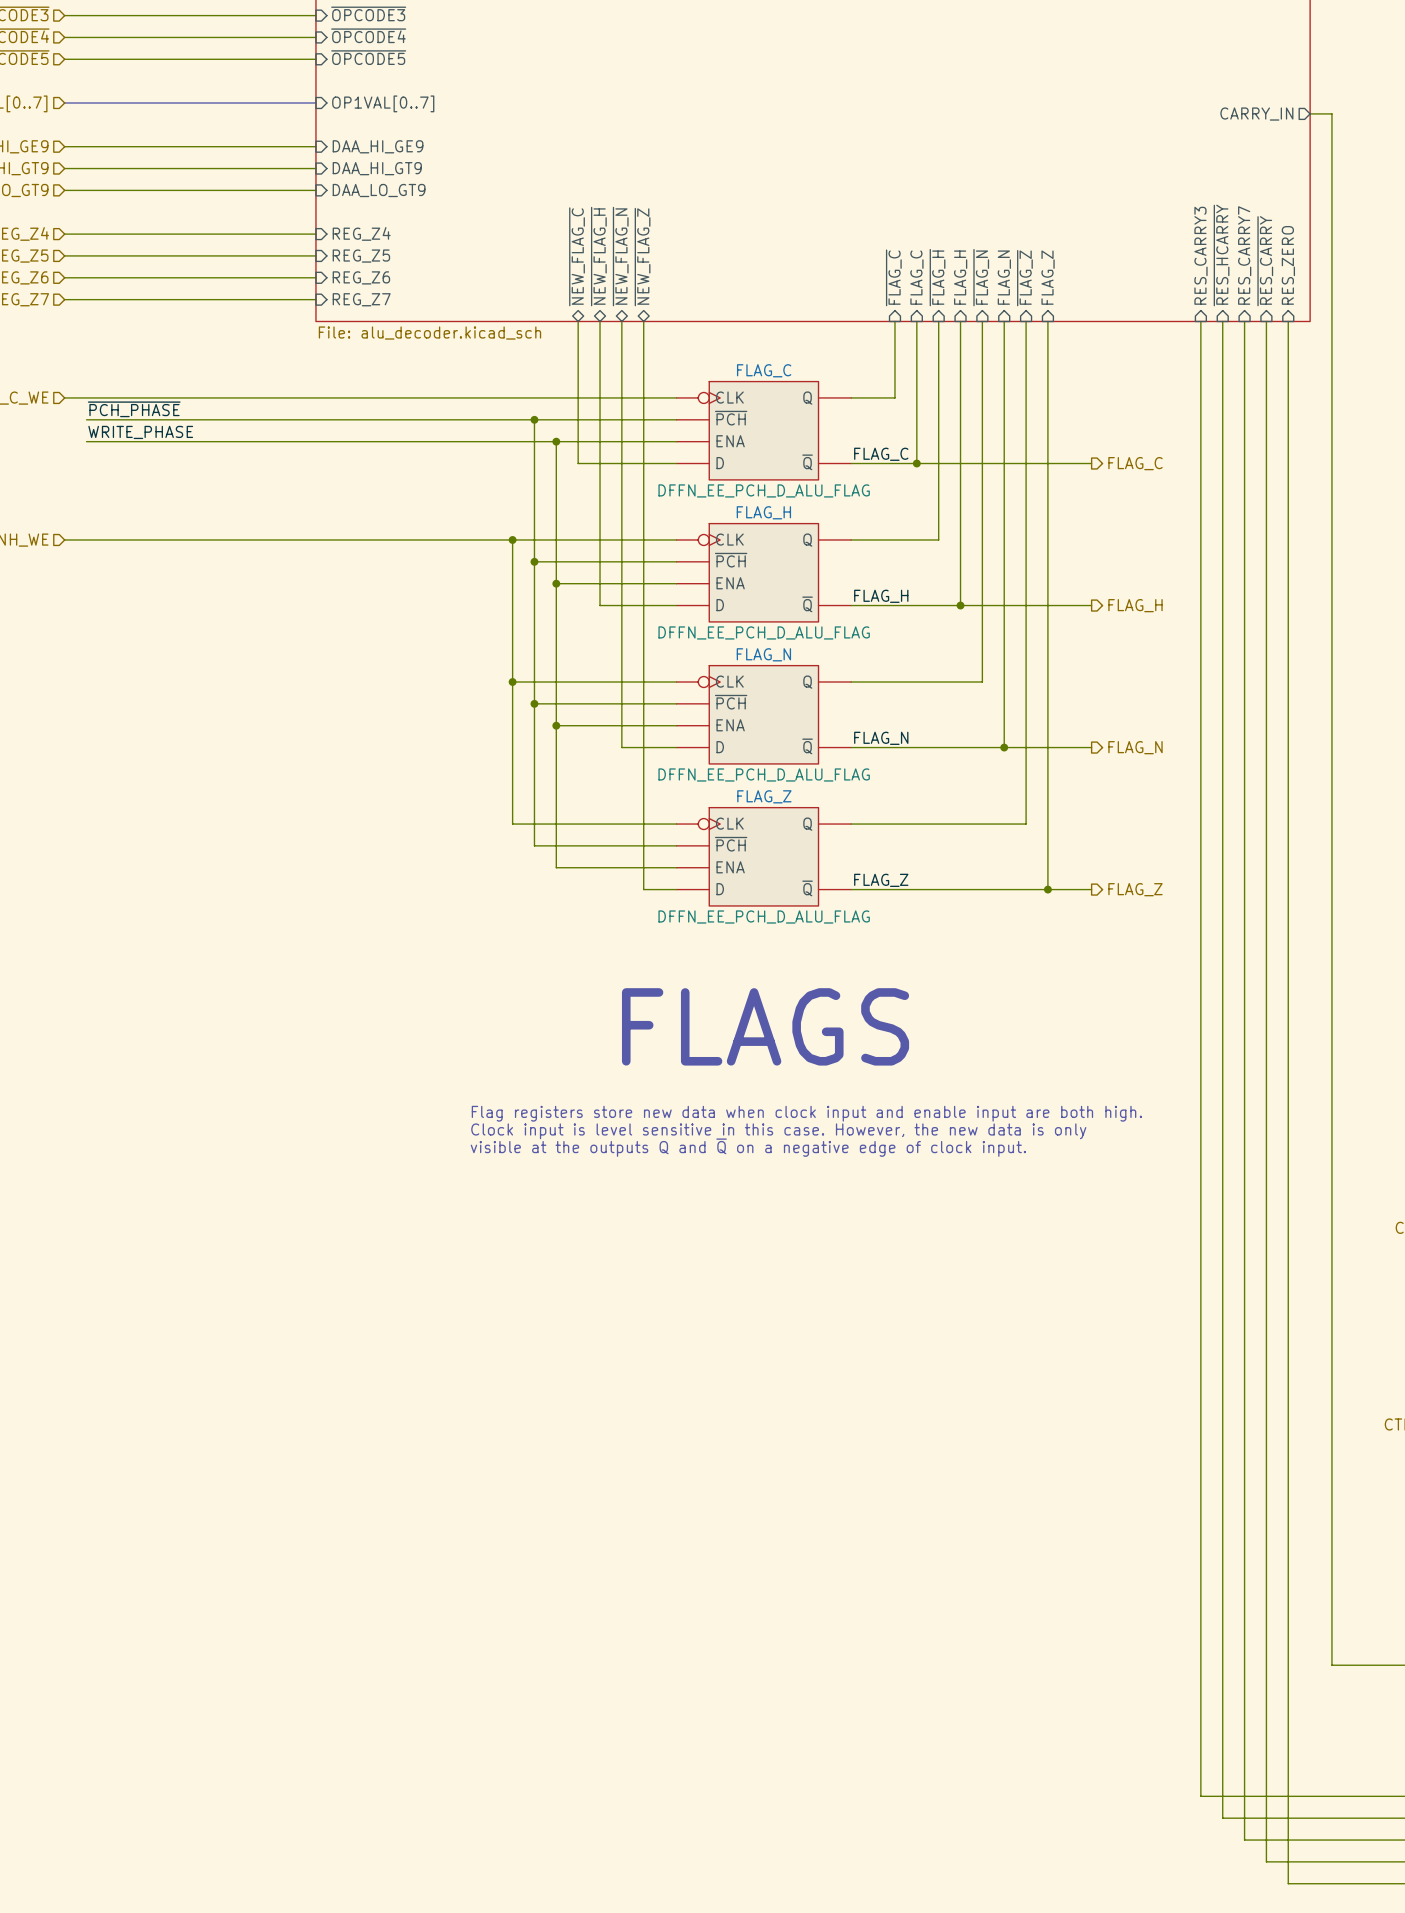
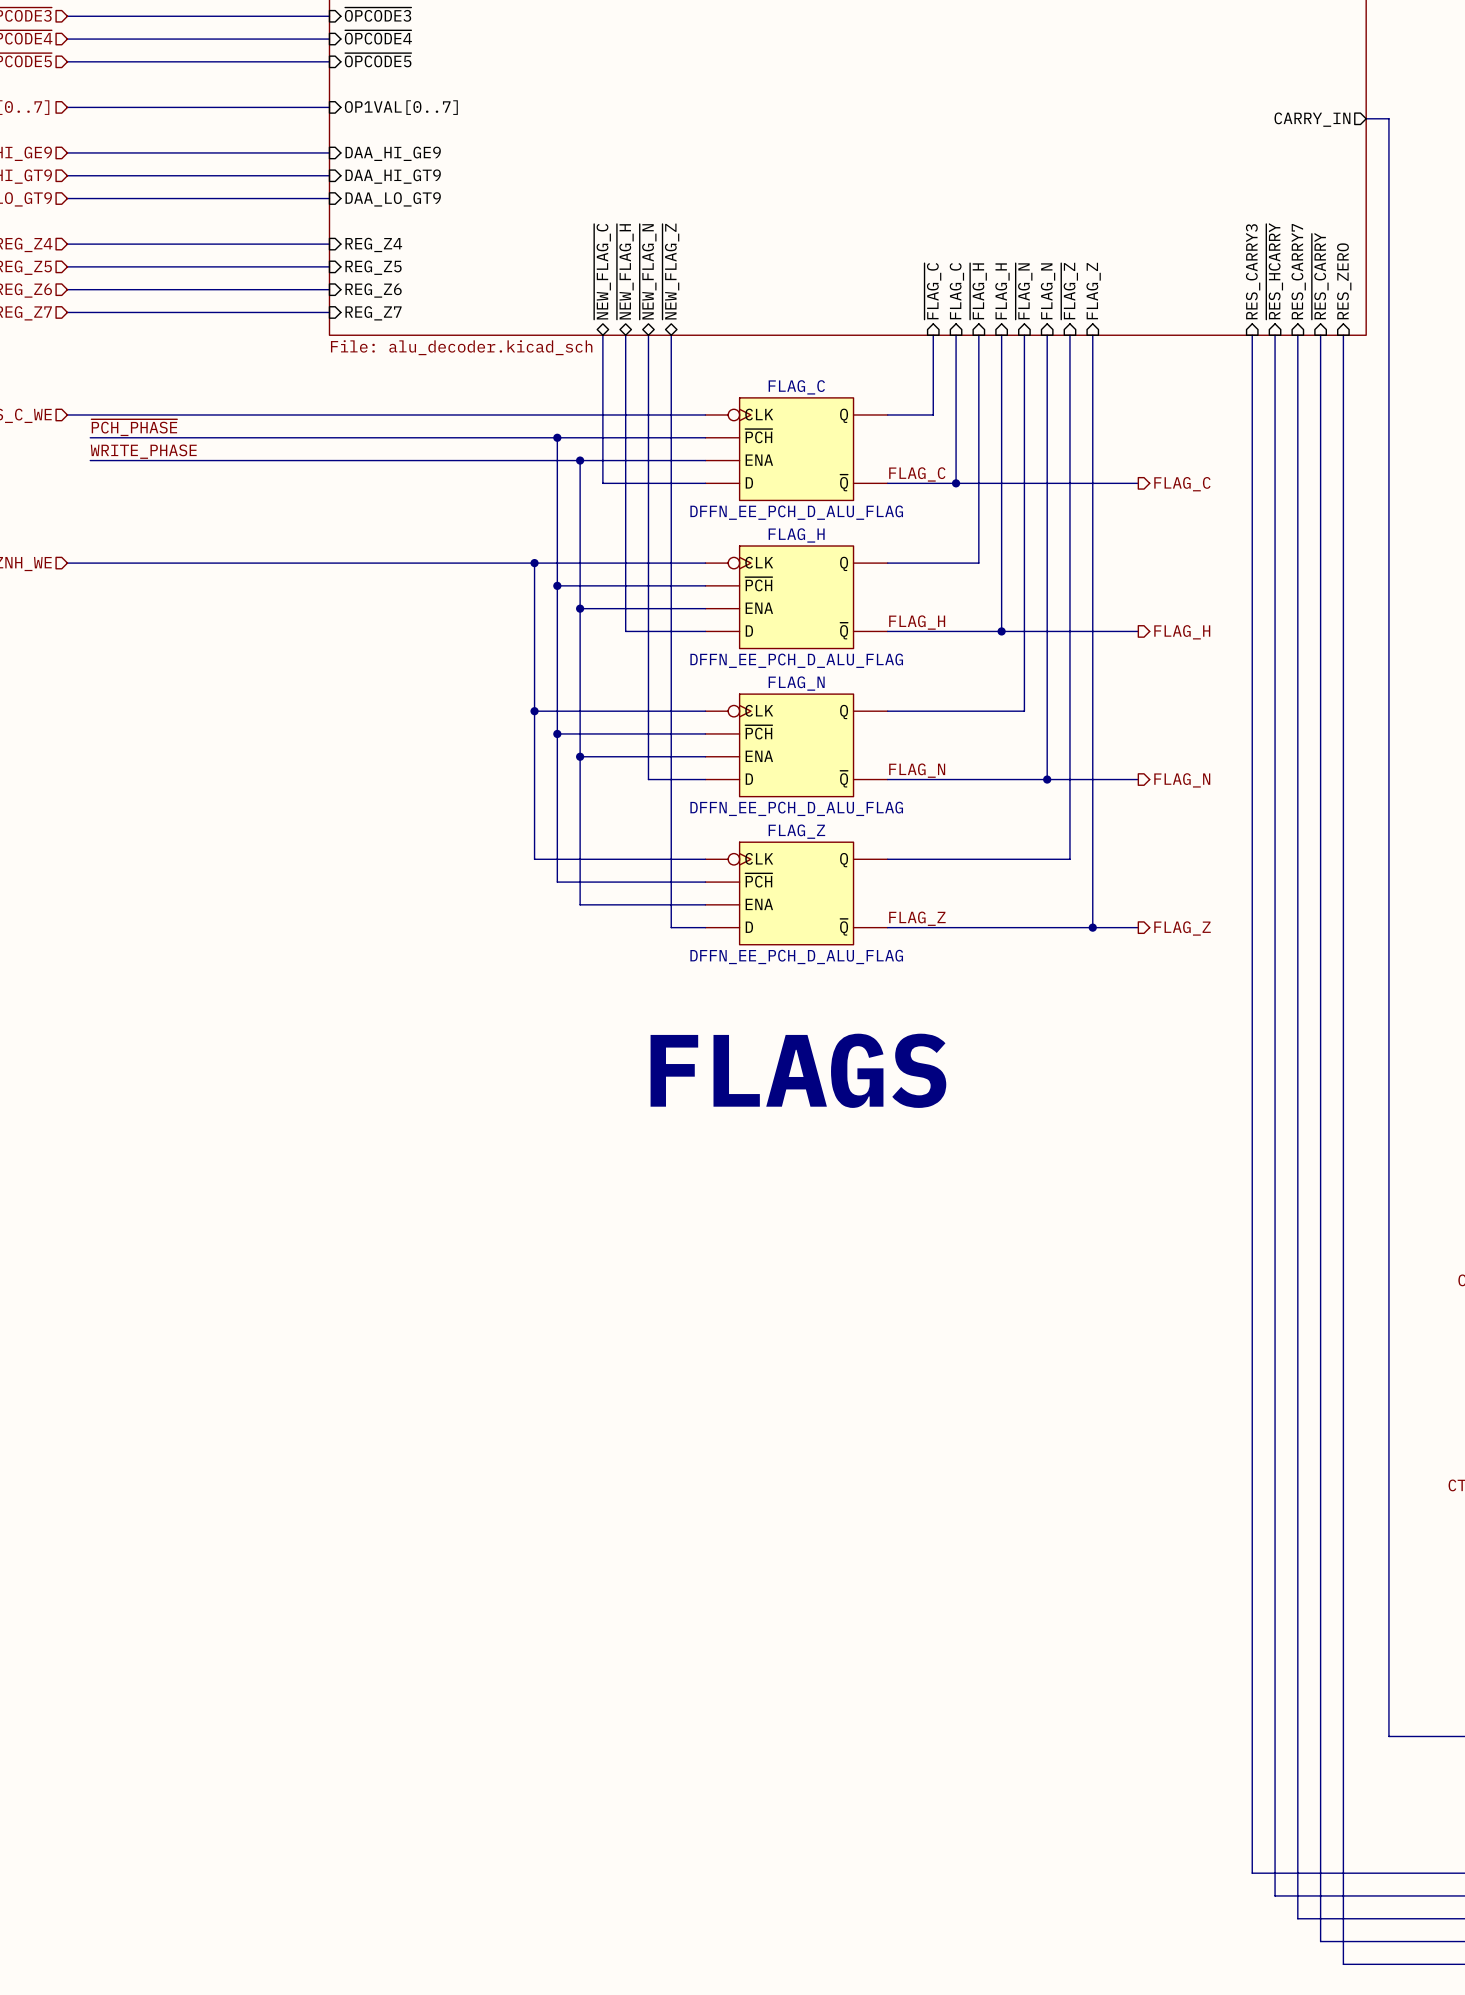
text: Flag registers store new data when clock input and enable input are both high. (806, 1113) -> none
text: Clock input is level sensitive in this case. However, the new data is only (778, 1131) -> none
text: visible at the outputs Q and ~{Q} on a negative edge of clock input. (748, 1147) -> none

